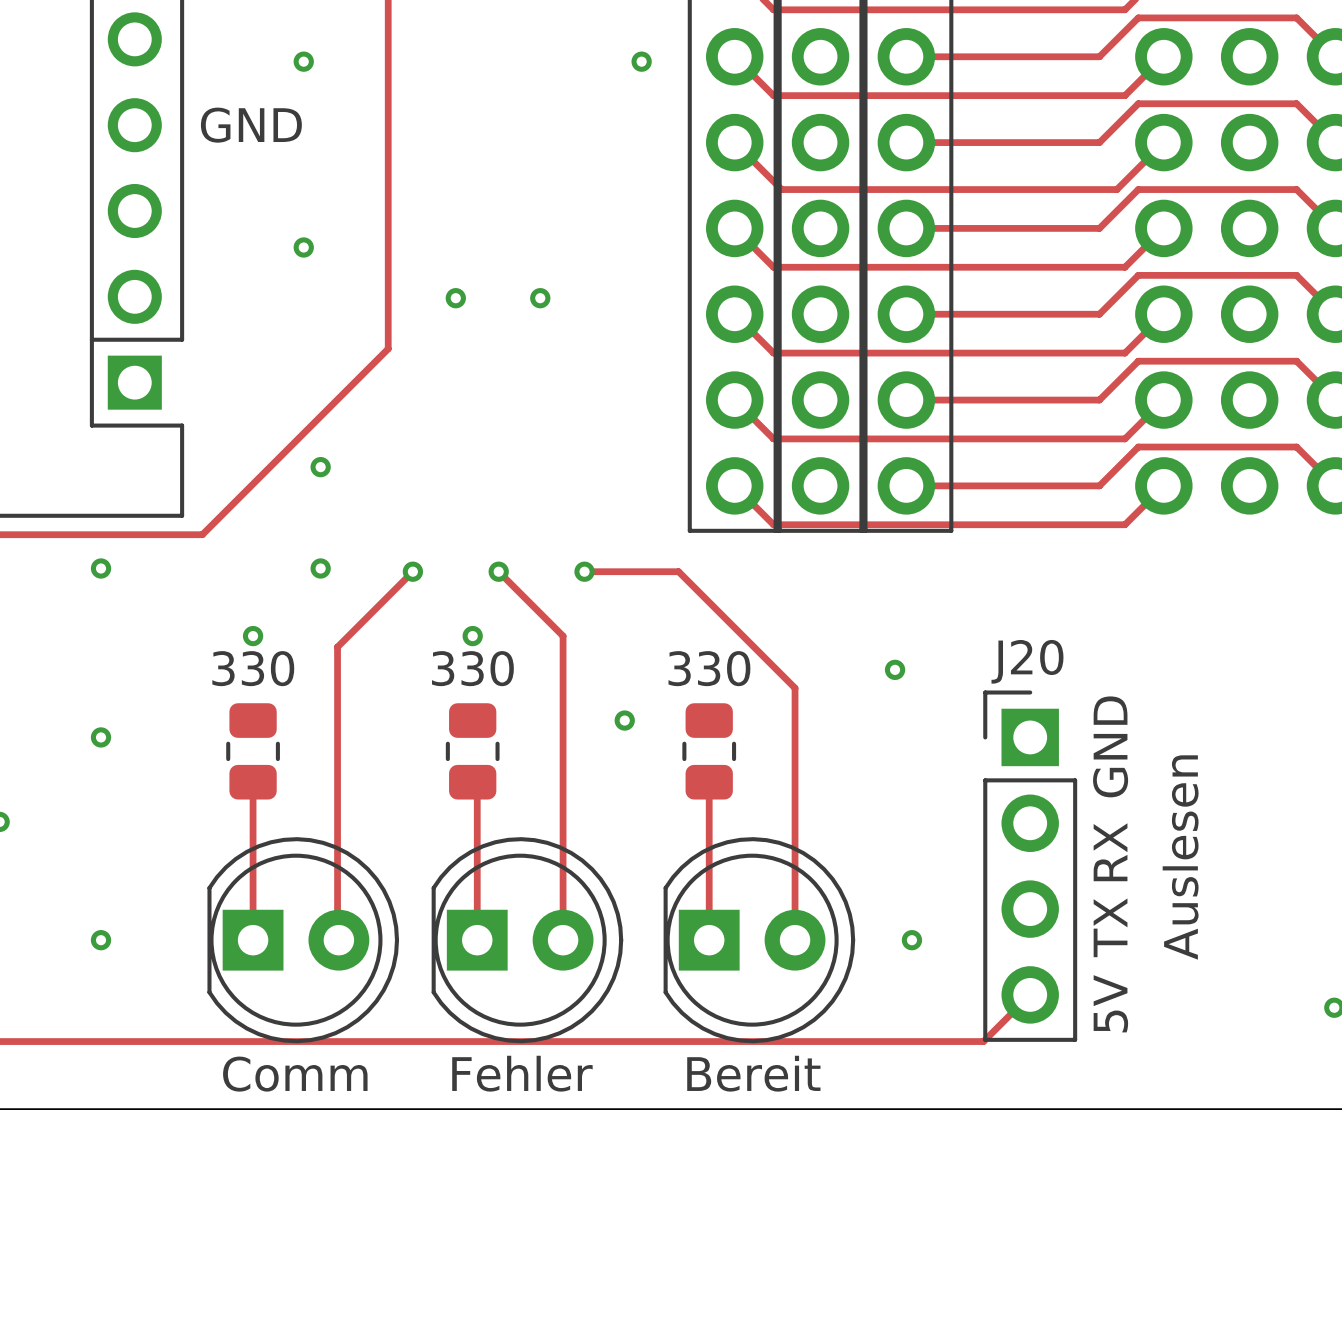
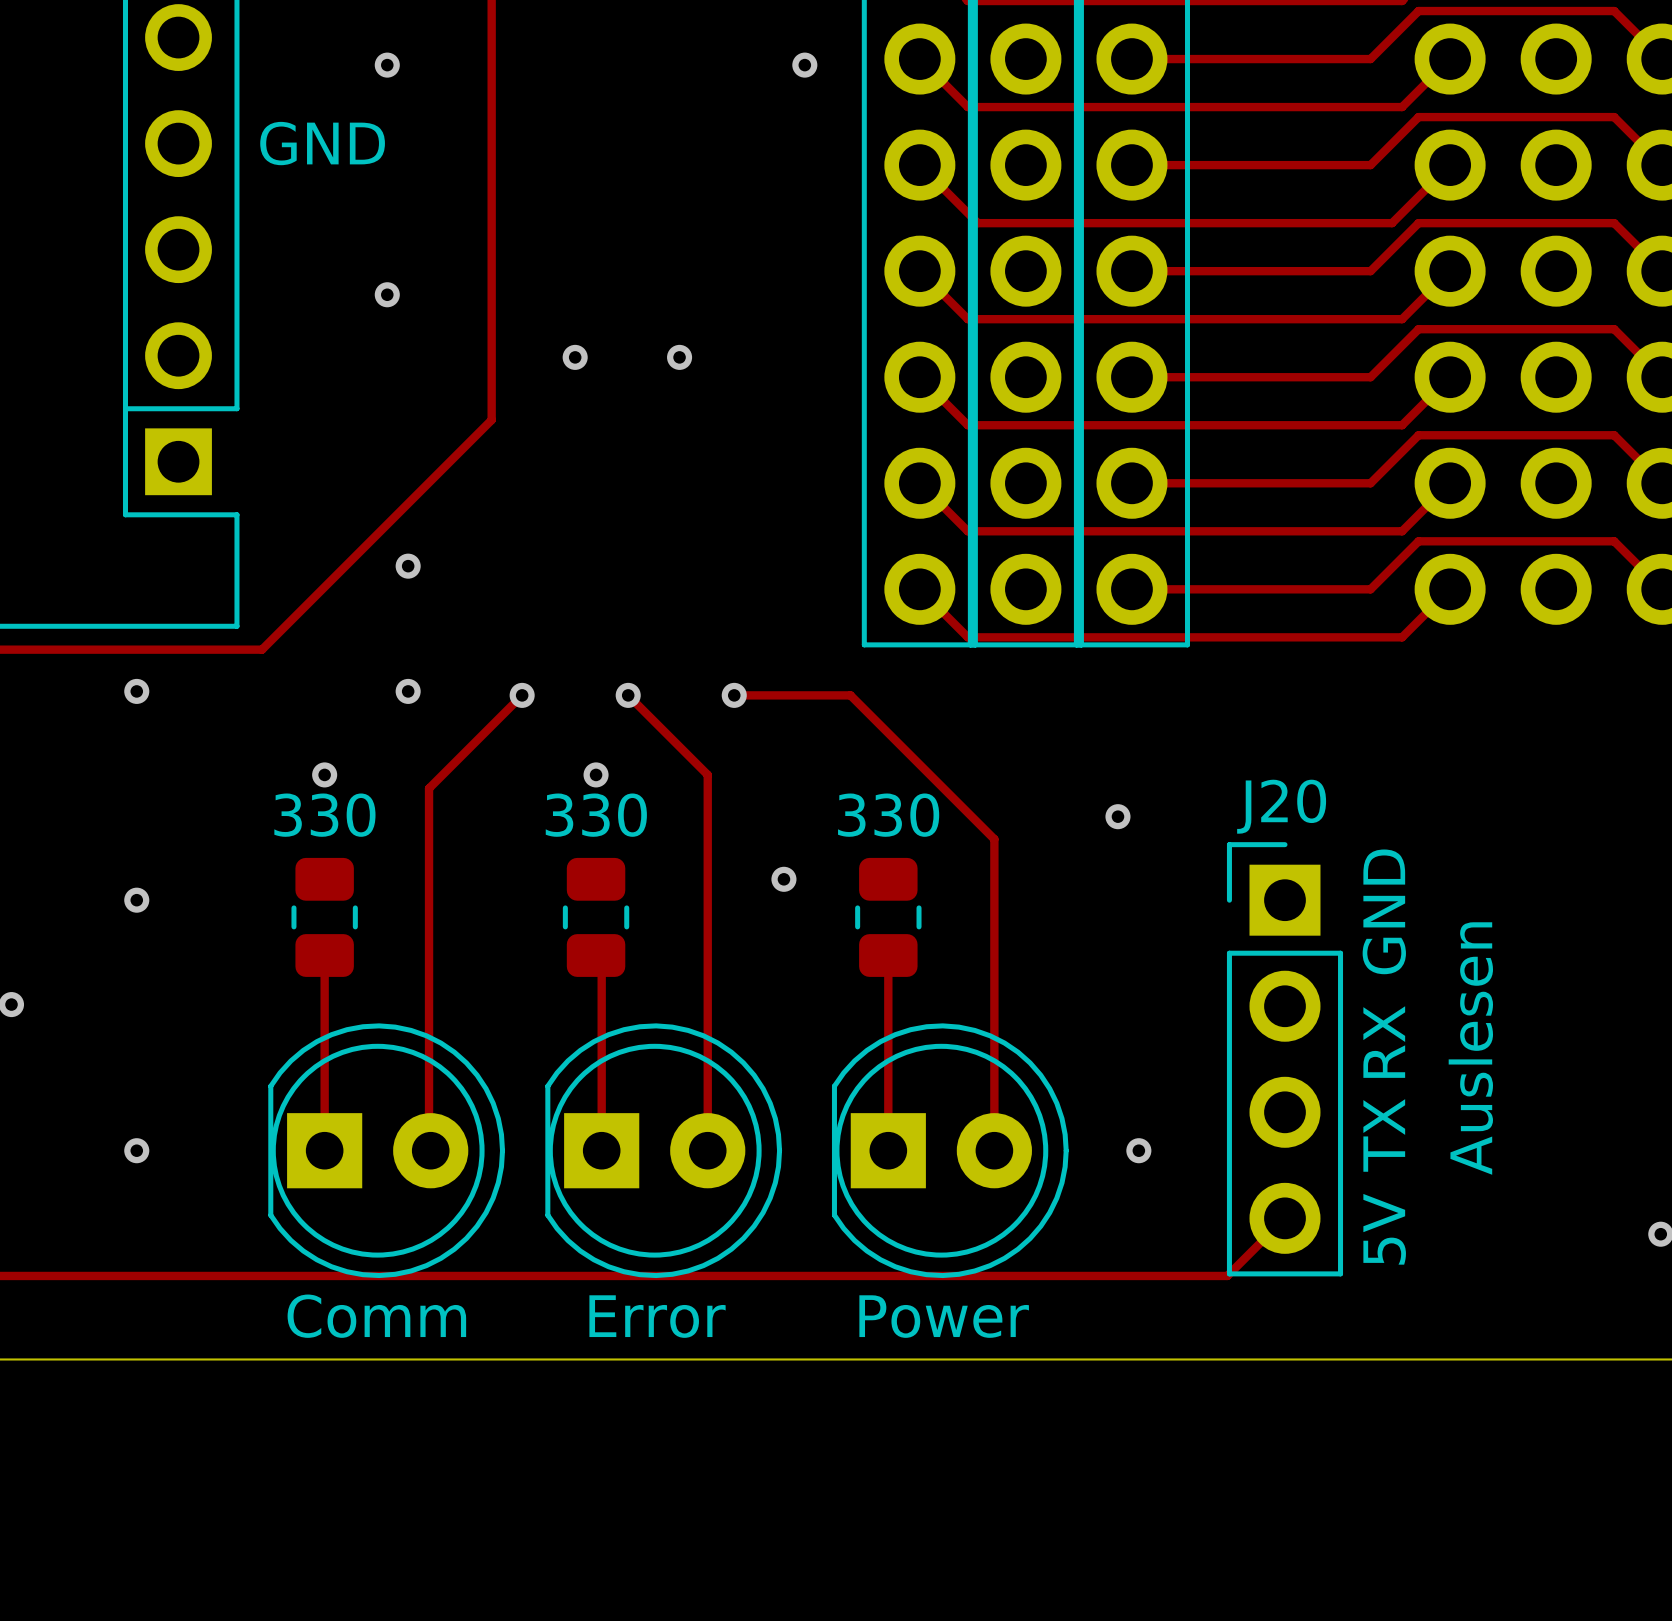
part value: Fehler (522, 1073) -> Error (657, 1316)
part value: Bereit (753, 1073) -> Power (944, 1316)

